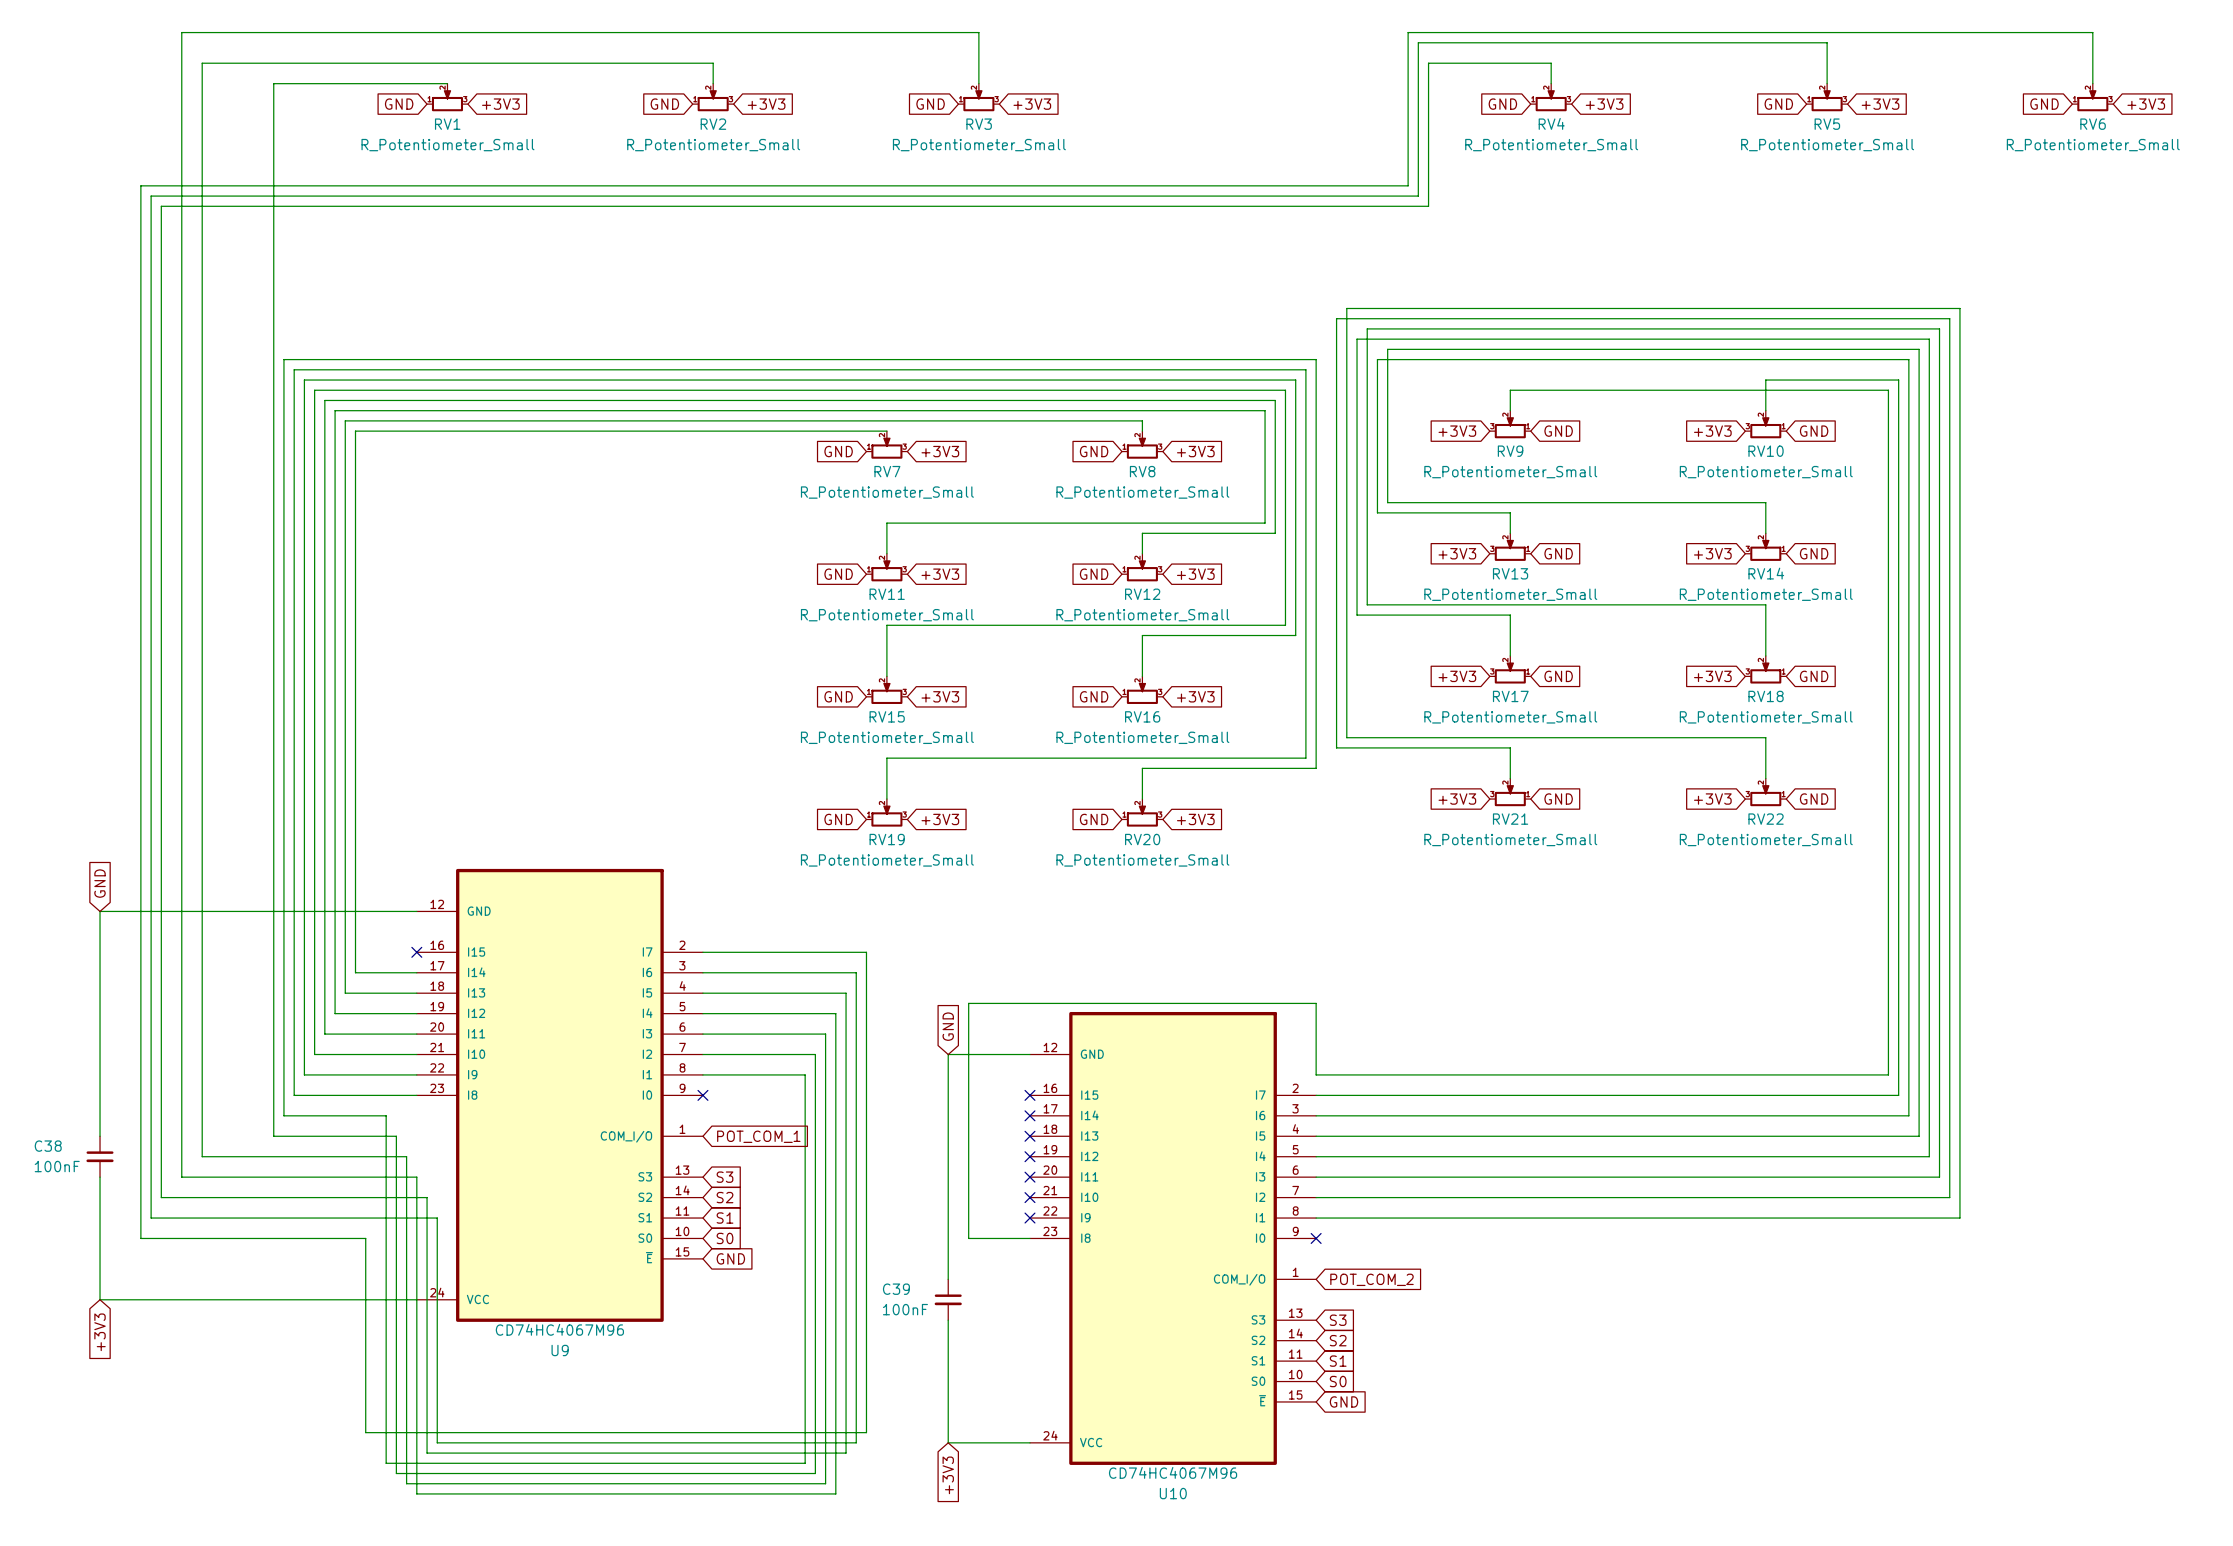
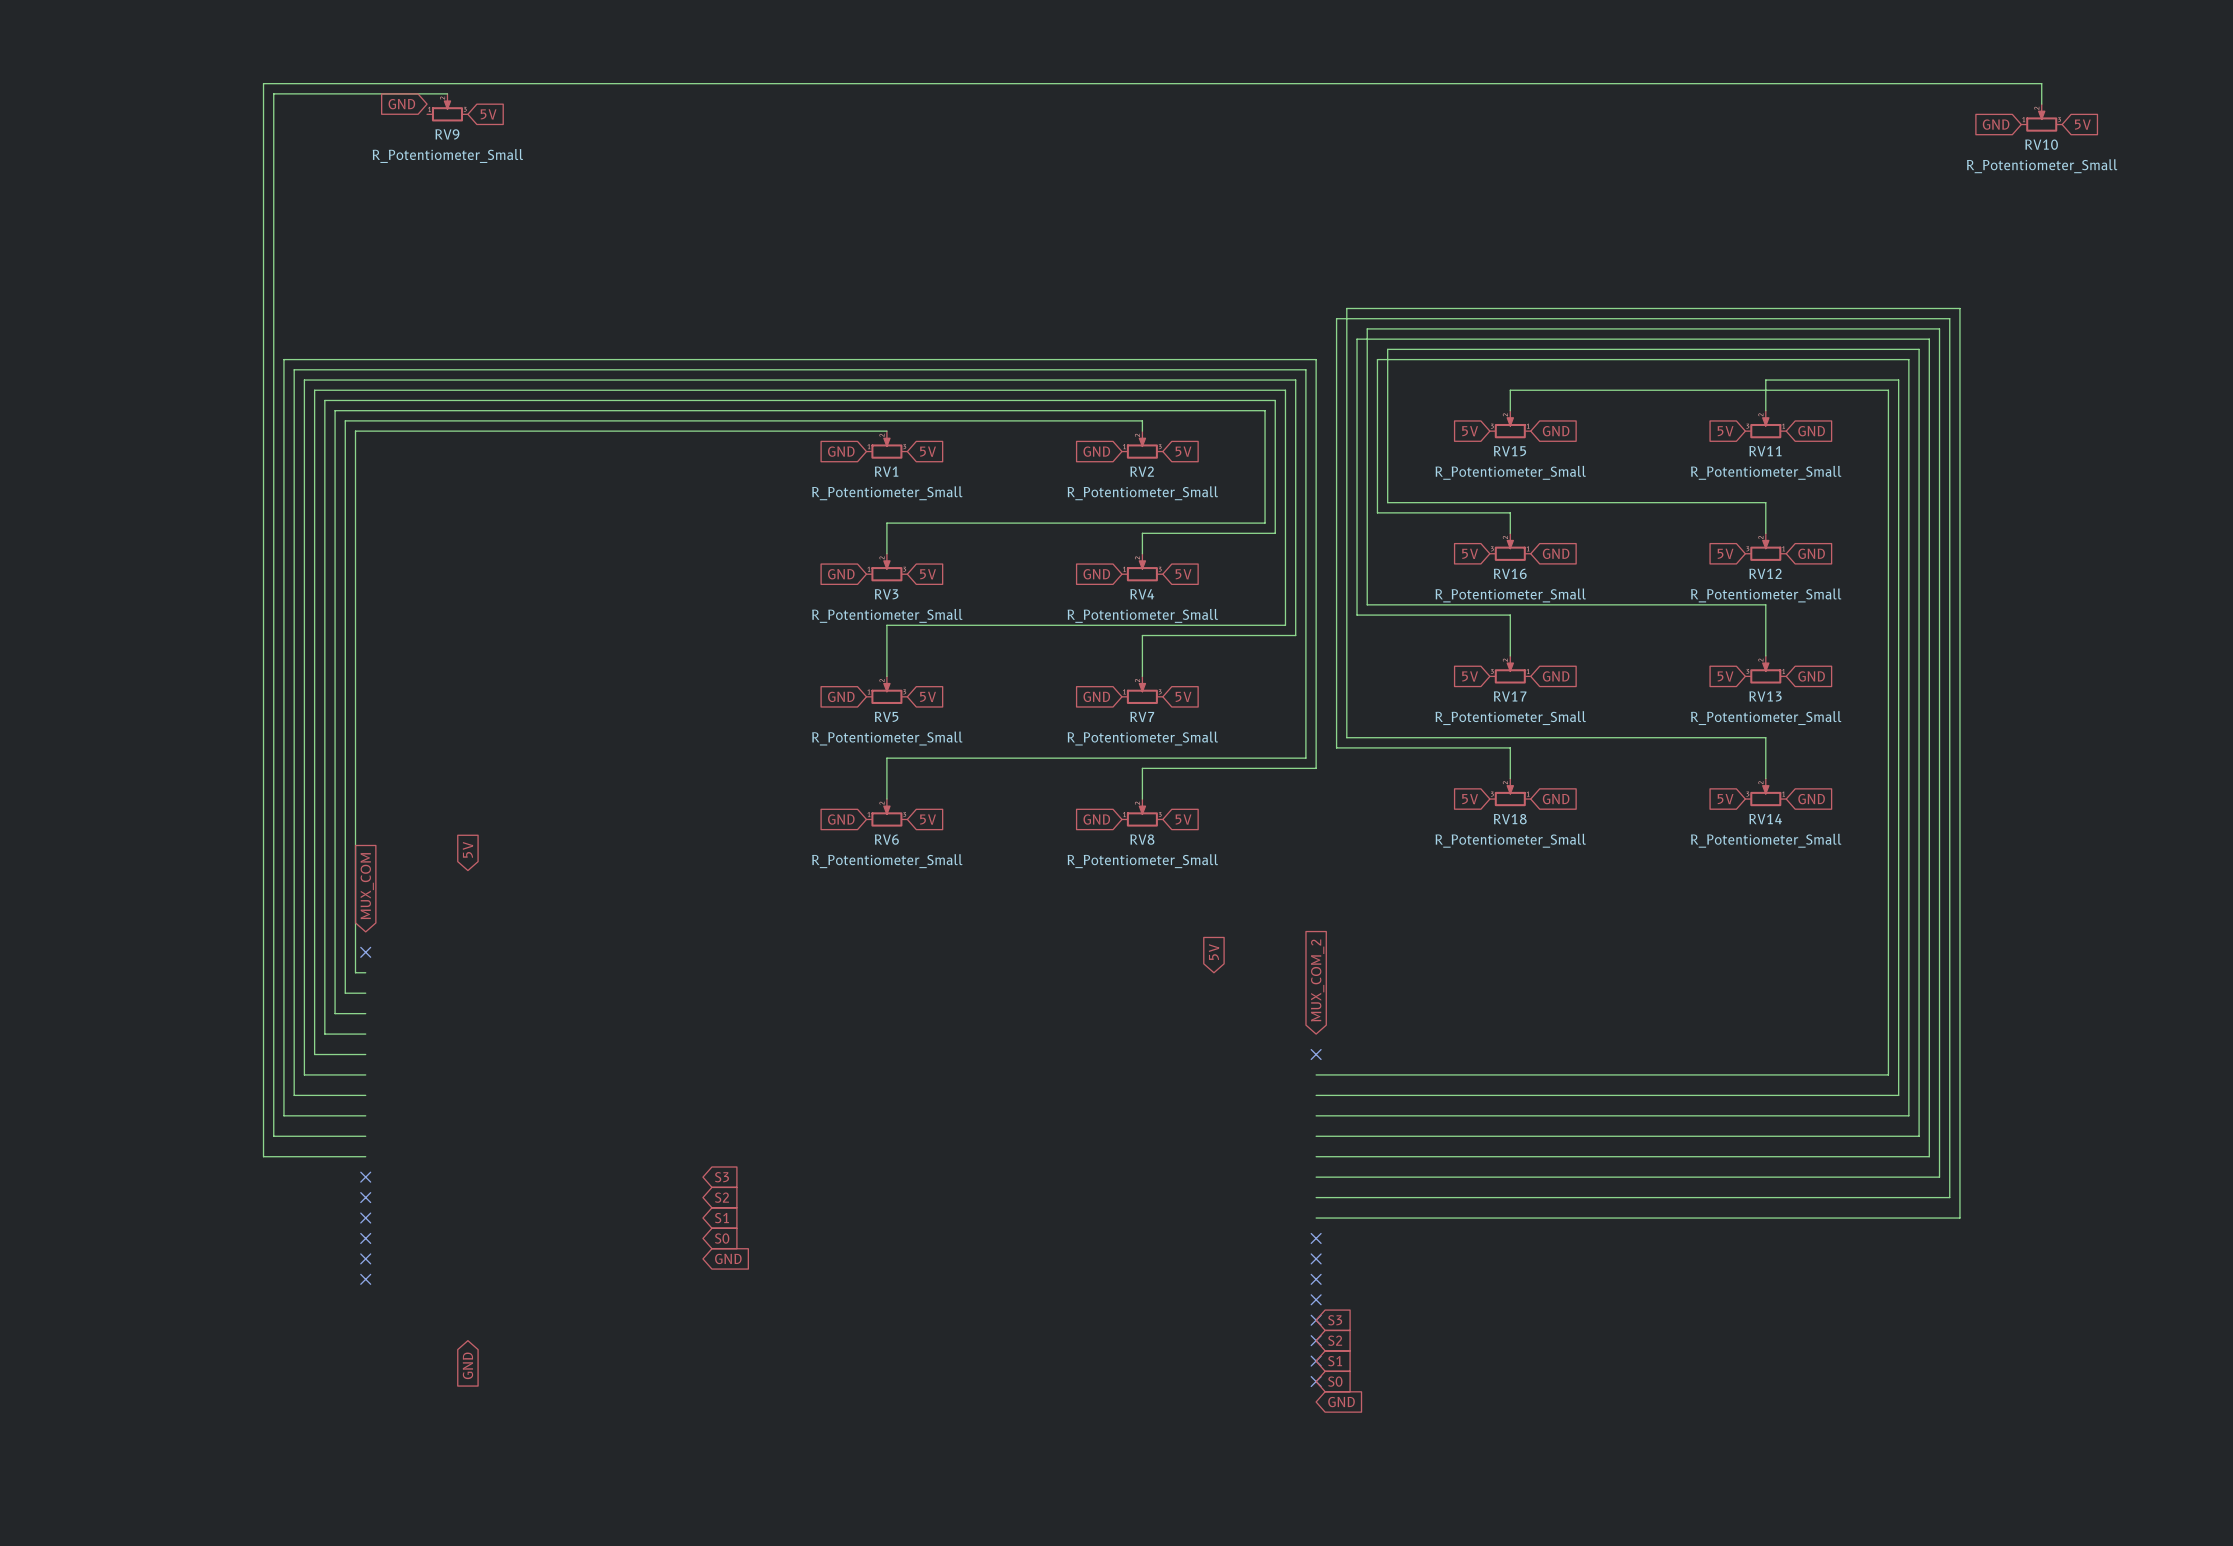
wire: (273, 83) (273, 93) -> (447, 93) (273, 93)
wire: none -> (447, 83) (2041, 83) (2041, 104)
wire: (713, 83) (713, 63) (202, 63) (202, 1156) (263, 1156) -> (273, 83) (263, 83) (263, 1156)
wire: (978, 83) (978, 32) (181, 32) (181, 1177) (416, 1177) (416, 1493) (835, 1493) (835, 1013) (702, 1013) -> none
wire: (1551, 83) (1551, 63) (1428, 63) (1428, 206) (161, 206) (161, 1197) (427, 1197) (427, 1453) (846, 1453) (846, 993) (702, 993) -> none
wire: (1827, 83) (1827, 42) (1418, 42) (1418, 196) (151, 196) (151, 1218) (437, 1218) (437, 1442) (856, 1442) (856, 972) (702, 972) -> none
wire: (2092, 83) (2092, 32) (1408, 32) (1408, 185) (140, 185) (140, 1238) (365, 1238) (365, 1432) (866, 1432) (866, 952) (702, 952) -> none
RV1: R_Potentiometer_Small (447, 97) -> none
RV2: R_Potentiometer_Small (713, 97) -> none
RV3: R_Potentiometer_Small (978, 97) -> none
RV4: R_Potentiometer_Small (1551, 97) -> none
RV5: R_Potentiometer_Small (1827, 97) -> none
RV6: R_Potentiometer_Small (2092, 97) -> none
global label: +3V3 (500, 104) -> none
global label: GND (664, 104) -> none
global label: +3V3 (766, 104) -> none
global label: GND (930, 104) -> none
global label: +3V3 (1032, 104) -> none
global label: GND (1502, 104) -> none
global label: +3V3 (1604, 104) -> none
global label: GND (1778, 104) -> none
global label: +3V3 (1880, 104) -> none
global label position: GND (2044, 104) -> GND (1996, 124)
global label: +3V3 (2146, 104) -> none
RV9: none -> R_Potentiometer_Small (447, 107)
global label: none -> 5V (488, 114)
RV10: none -> R_Potentiometer_Small (2041, 117)
global label: none -> 5V (2082, 124)
global label: +3V3 (1457, 431) -> 5V (1470, 431)
global label: +3V3 (1712, 431) -> 5V (1725, 431)
global label: +3V3 (940, 451) -> 5V (928, 451)
global label: +3V3 (1195, 451) -> 5V (1183, 451)
RV9 name: RV9 (1510, 451) -> RV15 (1509, 451)
RV10 name: RV10 (1766, 451) -> RV11 (1765, 451)
RV7 name: RV7 (887, 471) -> RV1 (886, 471)
RV8 name: RV8 (1142, 471) -> RV2 (1142, 471)
global label: +3V3 (1457, 553) -> 5V (1470, 553)
global label: +3V3 (1712, 553) -> 5V (1725, 553)
RV13 name: RV13 (1510, 573) -> RV16 (1510, 573)
RV14 name: RV14 (1766, 573) -> RV12 (1765, 573)
global label: +3V3 (940, 574) -> 5V (928, 574)
global label: +3V3 (1195, 574) -> 5V (1183, 574)
RV11 name: RV11 (887, 594) -> RV3 (886, 594)
RV12 name: RV12 (1142, 594) -> RV4 (1142, 594)
global label: +3V3 (1457, 676) -> 5V (1470, 676)
global label: +3V3 (1712, 676) -> 5V (1725, 676)
global label: +3V3 (940, 696) -> 5V (928, 696)
global label: +3V3 (1195, 696) -> 5V (1183, 696)
RV18 name: RV18 (1766, 696) -> RV13 (1765, 696)
RV15 name: RV15 (887, 716) -> RV5 (886, 716)
RV16 name: RV16 (1142, 716) -> RV7 (1142, 716)
global label: +3V3 (1457, 799) -> 5V (1470, 799)
global label: +3V3 (1712, 799) -> 5V (1725, 799)
global label: +3V3 (940, 819) -> 5V (928, 819)
global label: +3V3 (1195, 819) -> 5V (1183, 819)
RV21 name: RV21 (1510, 819) -> RV18 (1510, 819)
RV22 name: RV22 (1766, 819) -> RV14 (1765, 819)
RV19 name: RV19 (887, 839) -> RV6 (886, 839)
RV20 name: RV20 (1142, 839) -> RV8 (1142, 839)
global label: none -> 5V (467, 849)
global label: GND (100, 883) -> none
global label: none -> MUX_COM (367, 886)
wire: (416, 911) (100, 911) (100, 1136) -> none
global label: none -> 5V (1214, 952)
no-connect mark: none -> (365, 952)
no-connect mark: (416, 952) -> none
wire: (365, 972) (416, 972) -> none
global label: none -> MUX_COM_2 (1317, 980)
wire: (365, 993) (416, 993) -> none
wire: (365, 1013) (416, 1013) -> none
global label: GND (948, 1026) -> none
wire: (365, 1034) (416, 1034) -> none
wire: (702, 1034) (825, 1034) (825, 1483) (406, 1483) (406, 1156) (365, 1156) -> none
wire: (365, 1054) (416, 1054) -> none
wire: (702, 1054) (815, 1054) (815, 1473) (396, 1473) (396, 1136) (365, 1136) -> none
wire: (1029, 1054) (948, 1054) (948, 1279) -> none
no-connect mark: none -> (1316, 1054)
wire: (365, 1074) (416, 1074) -> none
wire: (702, 1074) (805, 1074) (805, 1463) (386, 1463) (386, 1115) (365, 1115) -> none
wire: (1316, 1074) (1316, 1003) (968, 1003) (968, 1238) (1029, 1238) -> none
wire: (365, 1095) (416, 1095) -> none
U9: CD74HC4067M96 (559, 1095) -> none
no-connect mark: (702, 1095) -> none
no-connect mark: (1029, 1095) -> none
no-connect mark: (1029, 1115) -> none
global label: POT_COM_1 (758, 1136) -> none
no-connect mark: (1029, 1136) -> none
C38: 100nF (100, 1156) -> none
no-connect mark: (1029, 1156) -> none
wire: (100, 1177) (100, 1299) (416, 1299) -> none
no-connect mark: none -> (365, 1177)
no-connect mark: (1029, 1177) -> none
no-connect mark: none -> (365, 1197)
no-connect mark: (1029, 1197) -> none
no-connect mark: none -> (365, 1218)
no-connect mark: (1029, 1218) -> none
no-connect mark: none -> (365, 1238)
U10: CD74HC4067M96 (1173, 1238) -> none
no-connect mark: none -> (365, 1258)
no-connect mark: none -> (1316, 1258)
no-connect mark: none -> (365, 1279)
no-connect mark: none -> (1316, 1279)
global label: POT_COM_2 (1371, 1279) -> none
C39: 100nF (948, 1299) -> none
no-connect mark: none -> (1316, 1299)
wire: (948, 1320) (948, 1442) (1029, 1442) -> none
no-connect mark: none -> (1316, 1320)
global label: +3V3 (100, 1332) -> none
no-connect mark: none -> (1316, 1340)
no-connect mark: none -> (1316, 1361)
global label: none -> GND (467, 1365)
no-connect mark: none -> (1316, 1381)
global label: +3V3 (948, 1475) -> none

